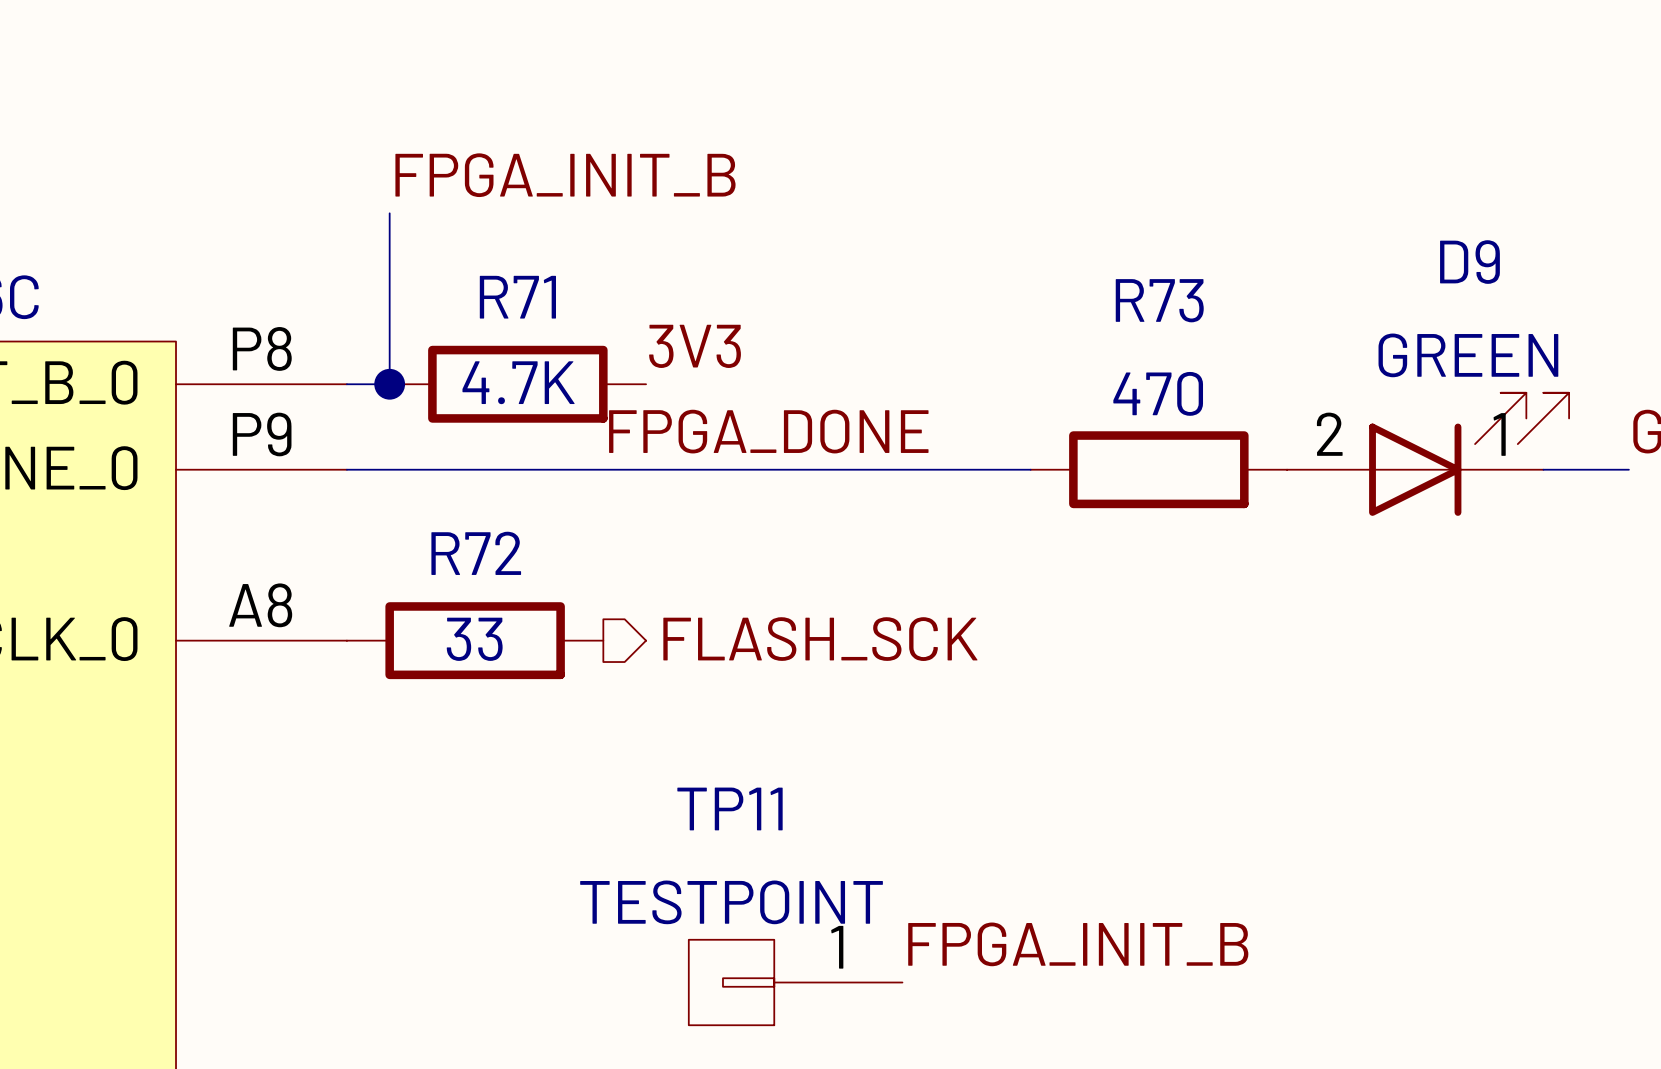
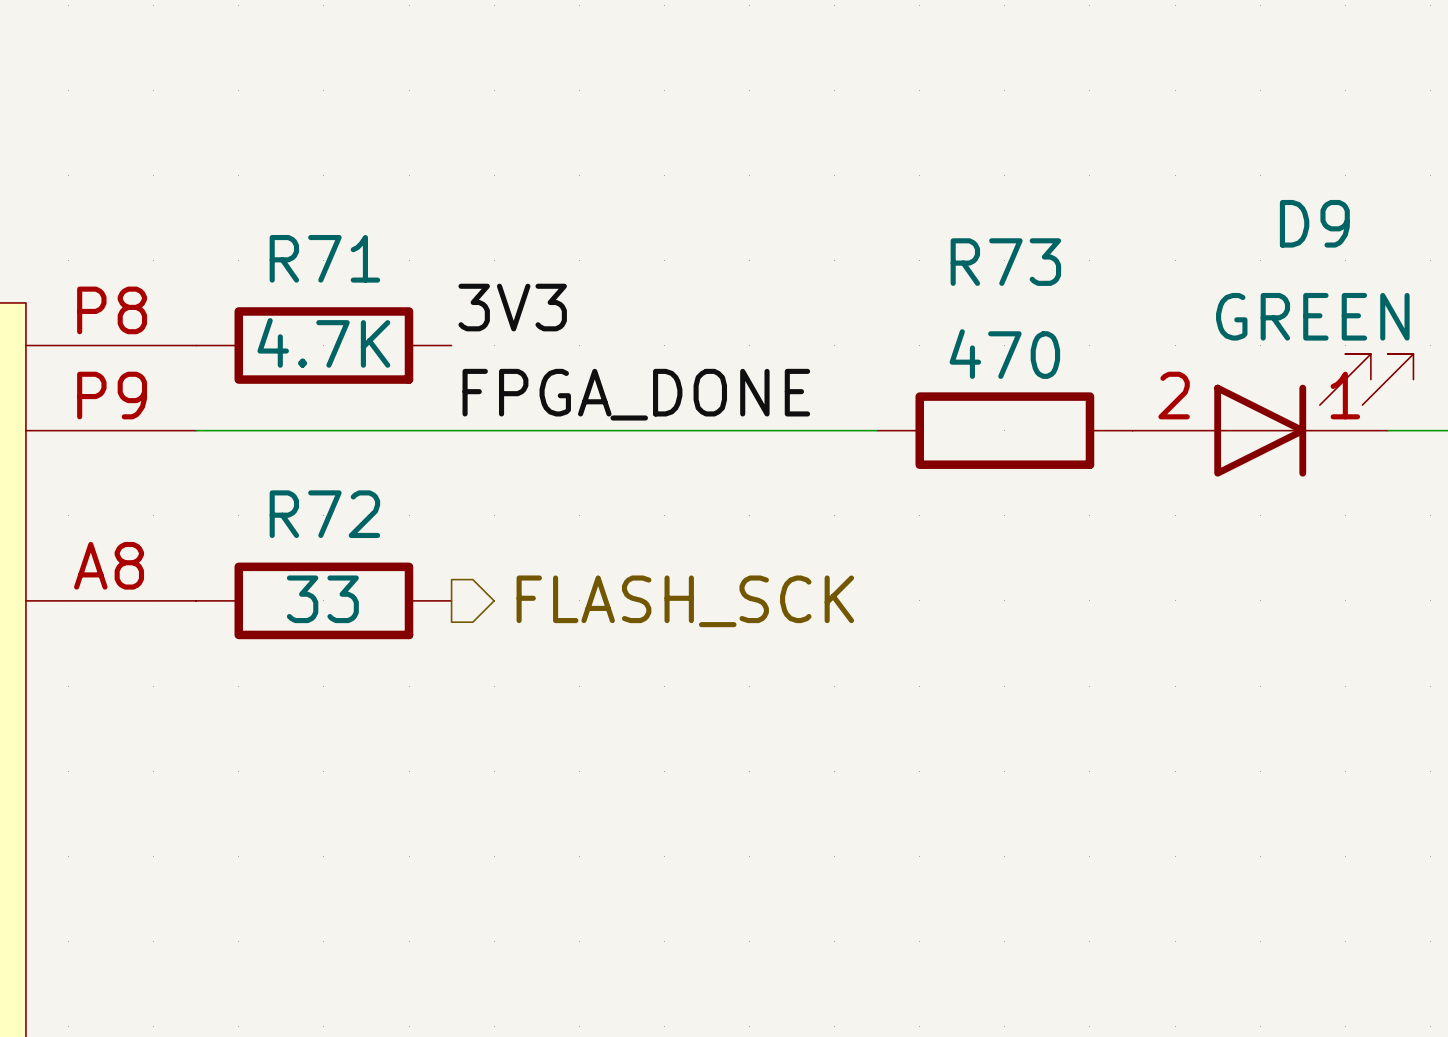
label: FPGA_INIT_B (565, 175) -> none
wire: (389, 213) (389, 384) (346, 384) -> none
label position: 3V3 (695, 346) -> 3V3 (512, 307)
junction: (389, 384) -> none
R71 position: (517, 384) -> (323, 345)
label: FPGA_INIT_B (1078, 944) -> none
TP11: TESTPOINT (795, 982) -> none

